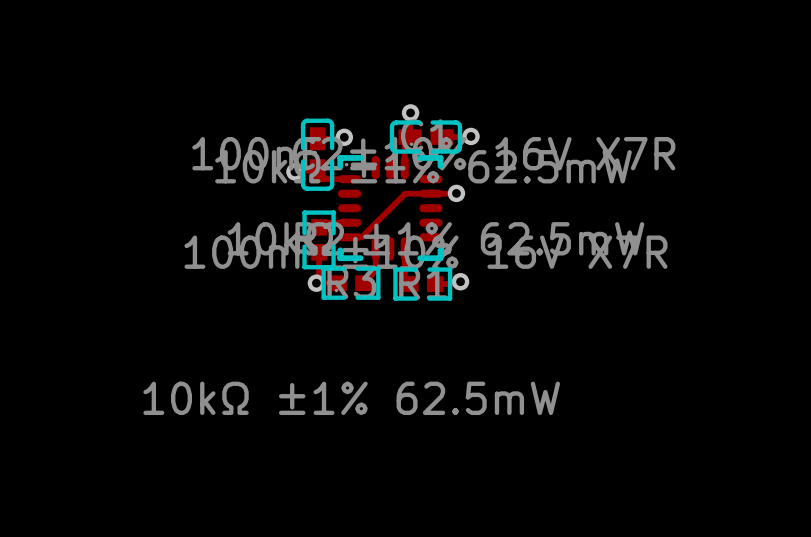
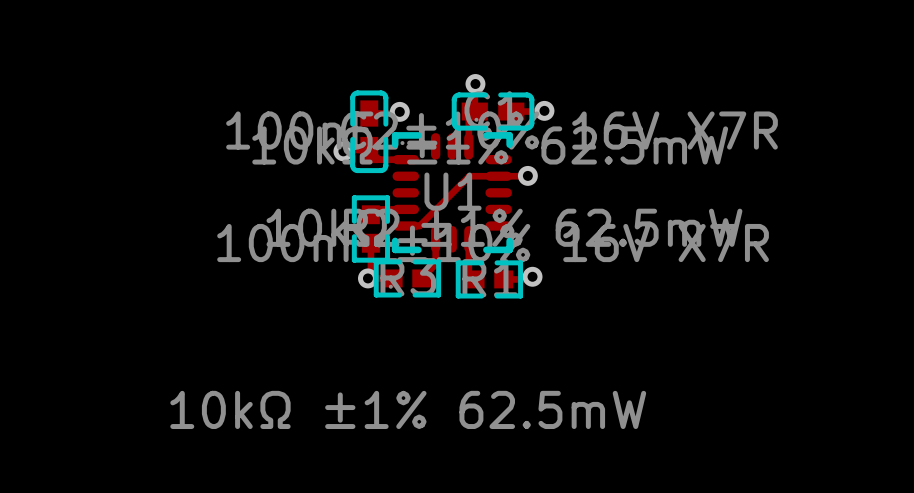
U1 name: none -> U1 (453, 191)

